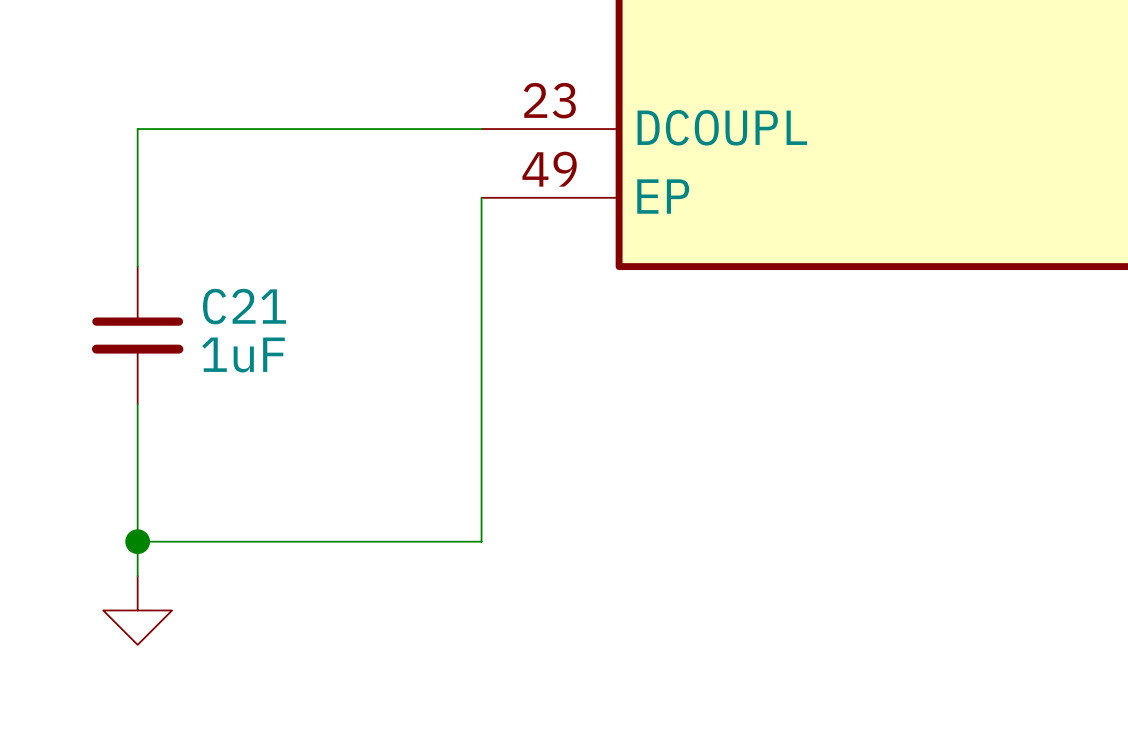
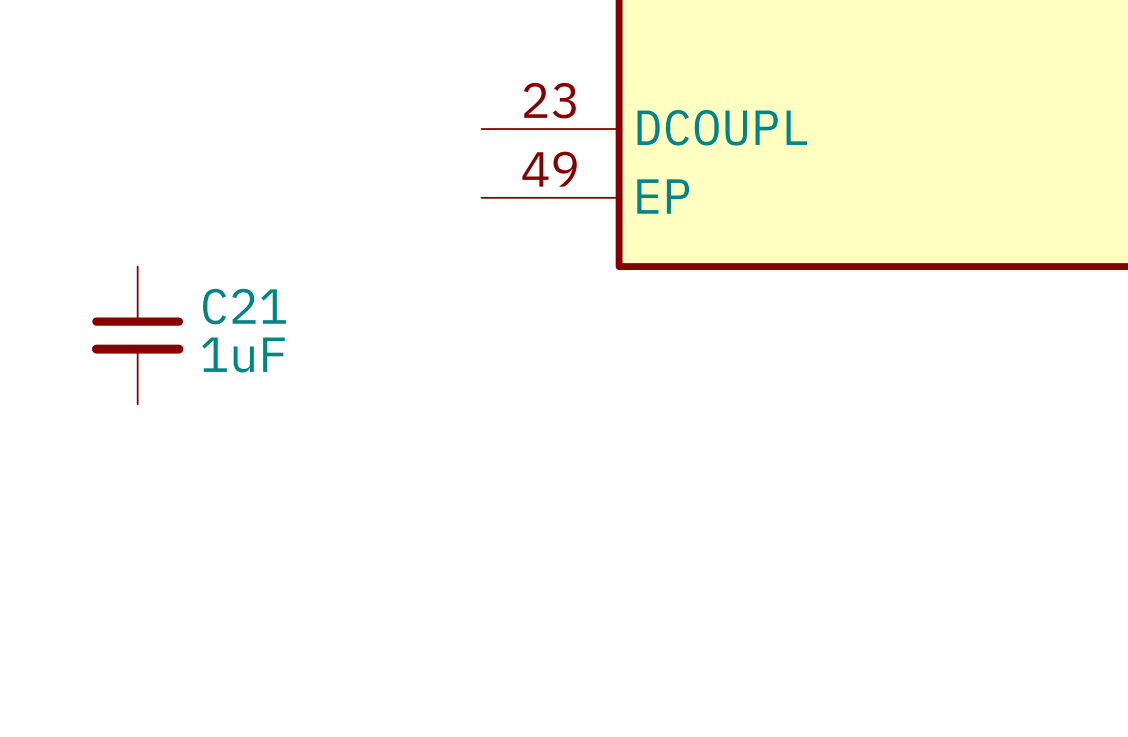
wire: (481, 129) (137, 129) (137, 266) -> none
wire: (481, 197) (481, 541) (137, 541) -> none
wire: (137, 404) (137, 576) -> none
junction: (137, 541) -> none
power symbol: (137, 610) -> none

